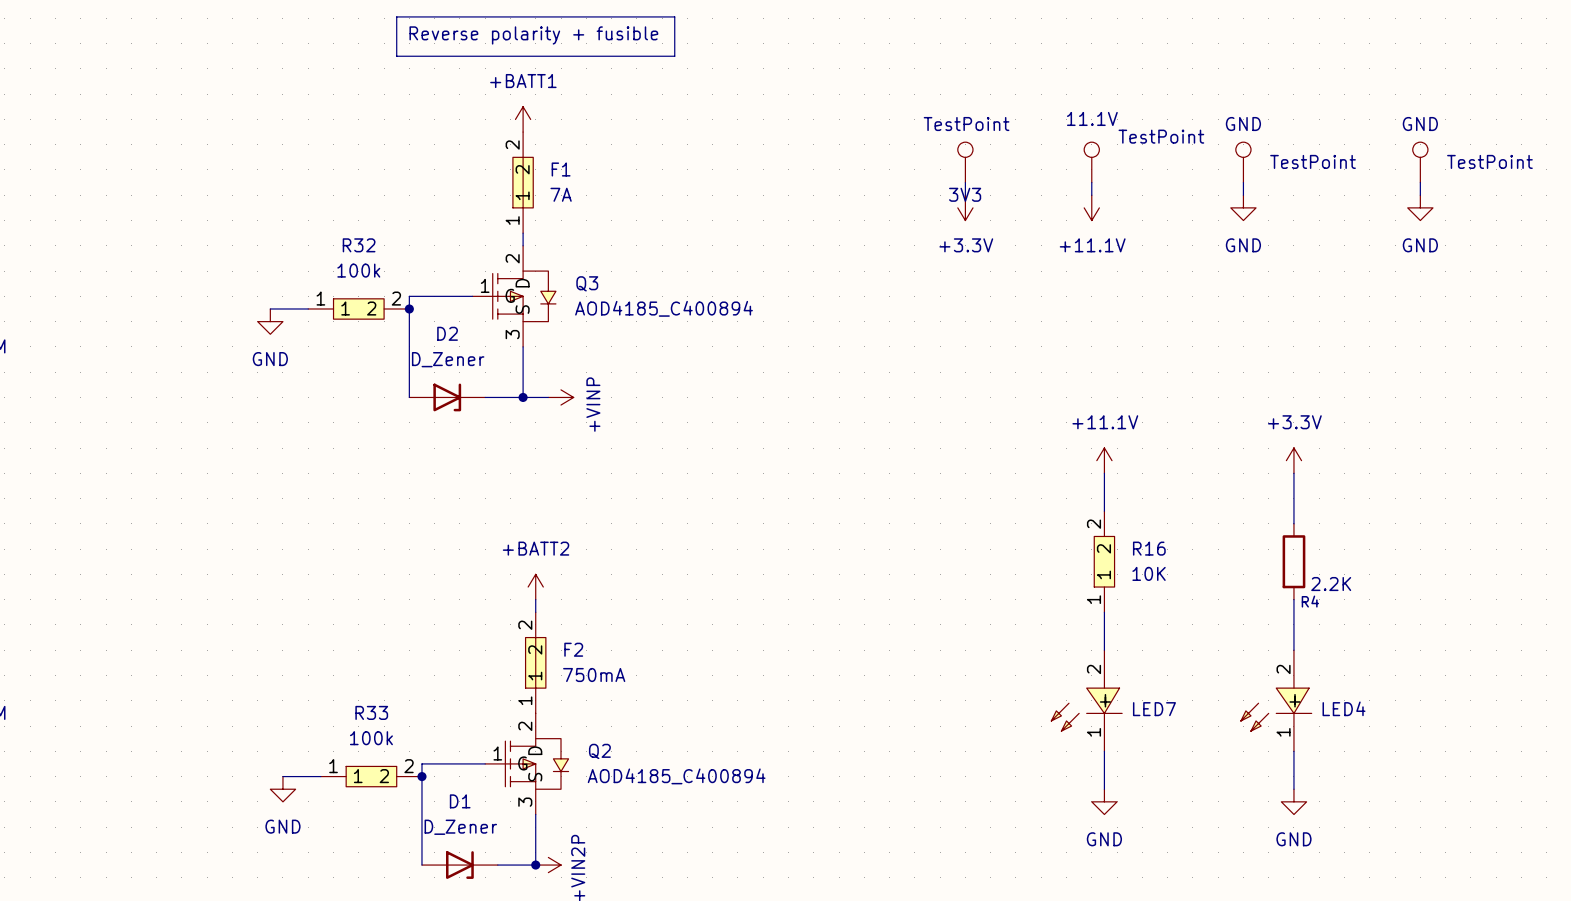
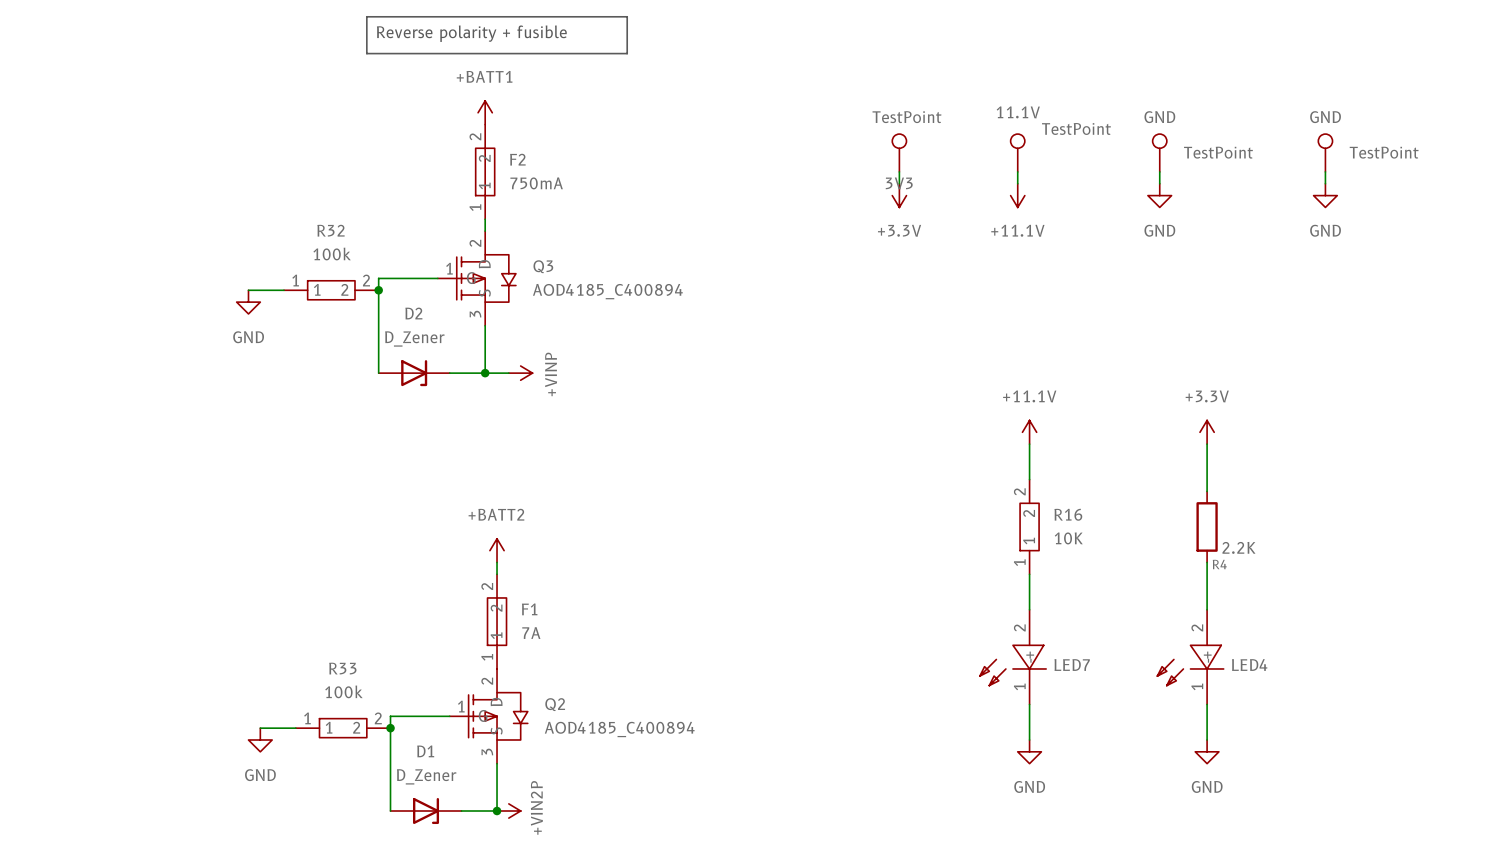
F1 name: F1 (561, 169) -> F2 (517, 159)
F1 value: 7A (561, 194) -> 750mA (536, 183)
F2 name: F2 (573, 649) -> F1 (529, 609)
F2 value: 750mA (594, 675) -> 7A (531, 633)

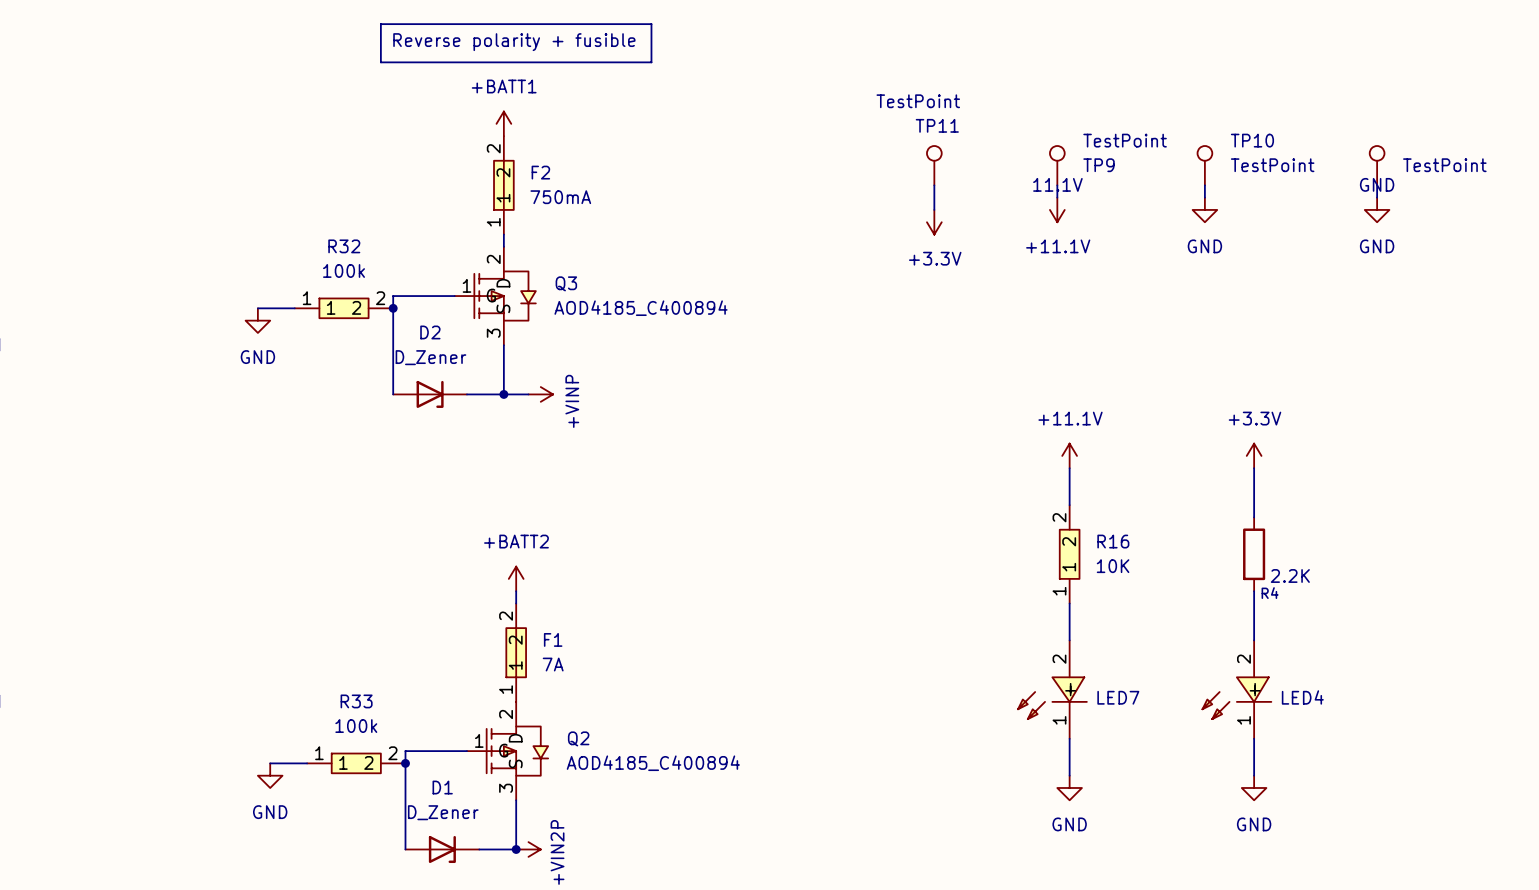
TP9 text position: 11.1V (1018, 112) -> 11.1V (1057, 184)
TP11 name: none -> TP11 (937, 125)
TP11 value position: TestPoint (906, 117) -> TestPoint (918, 101)
TP10 text: GND (1159, 117) -> none
part text position: GND (1325, 117) -> GND (1377, 184)
TP10 name: none -> TP10 (1252, 140)
TP9 name: none -> TP9 (1099, 165)
power symbol: +3.3V (899, 195) -> none
power symbol: none -> +3.3V (934, 222)

